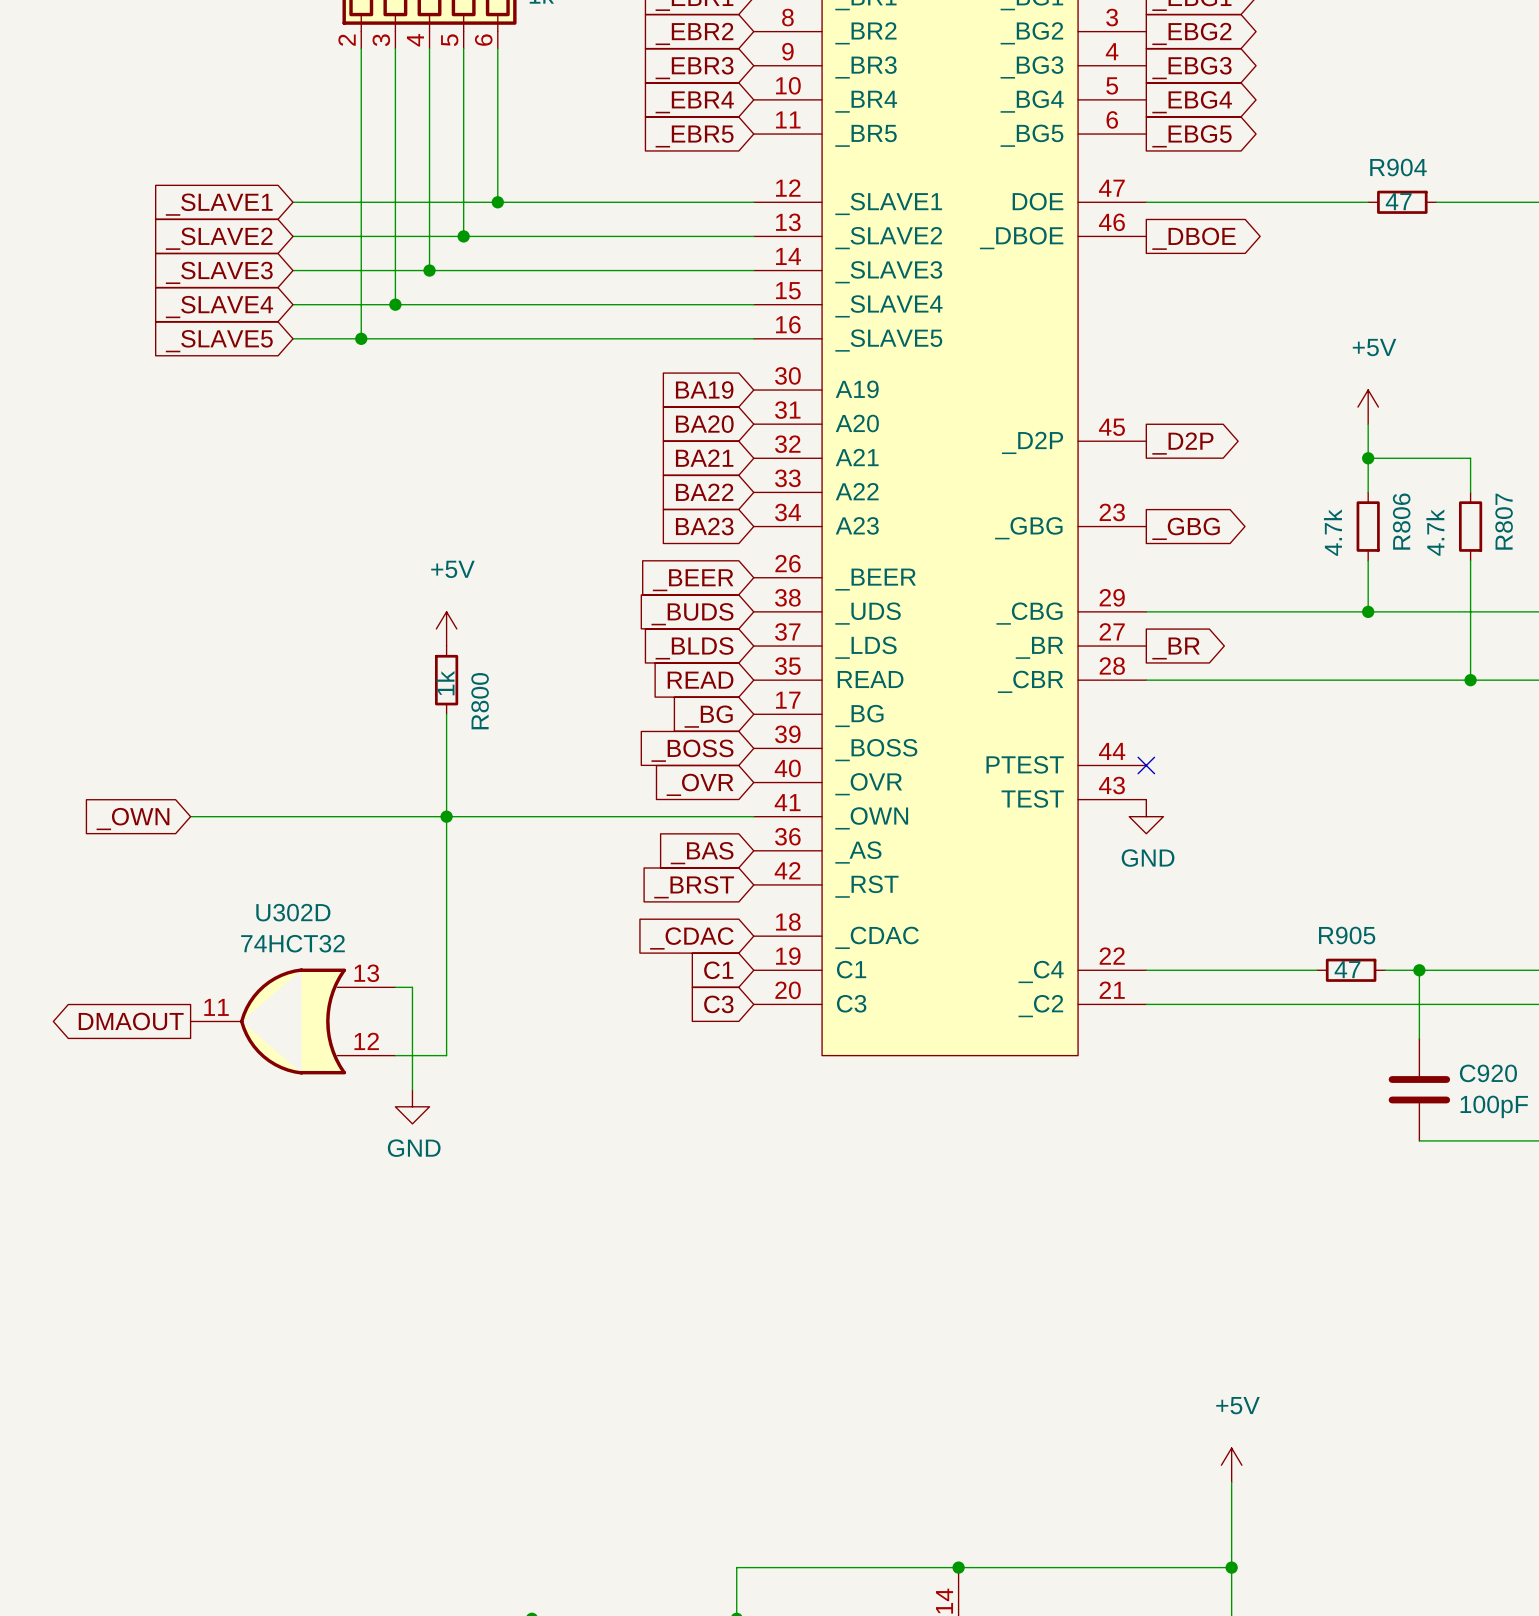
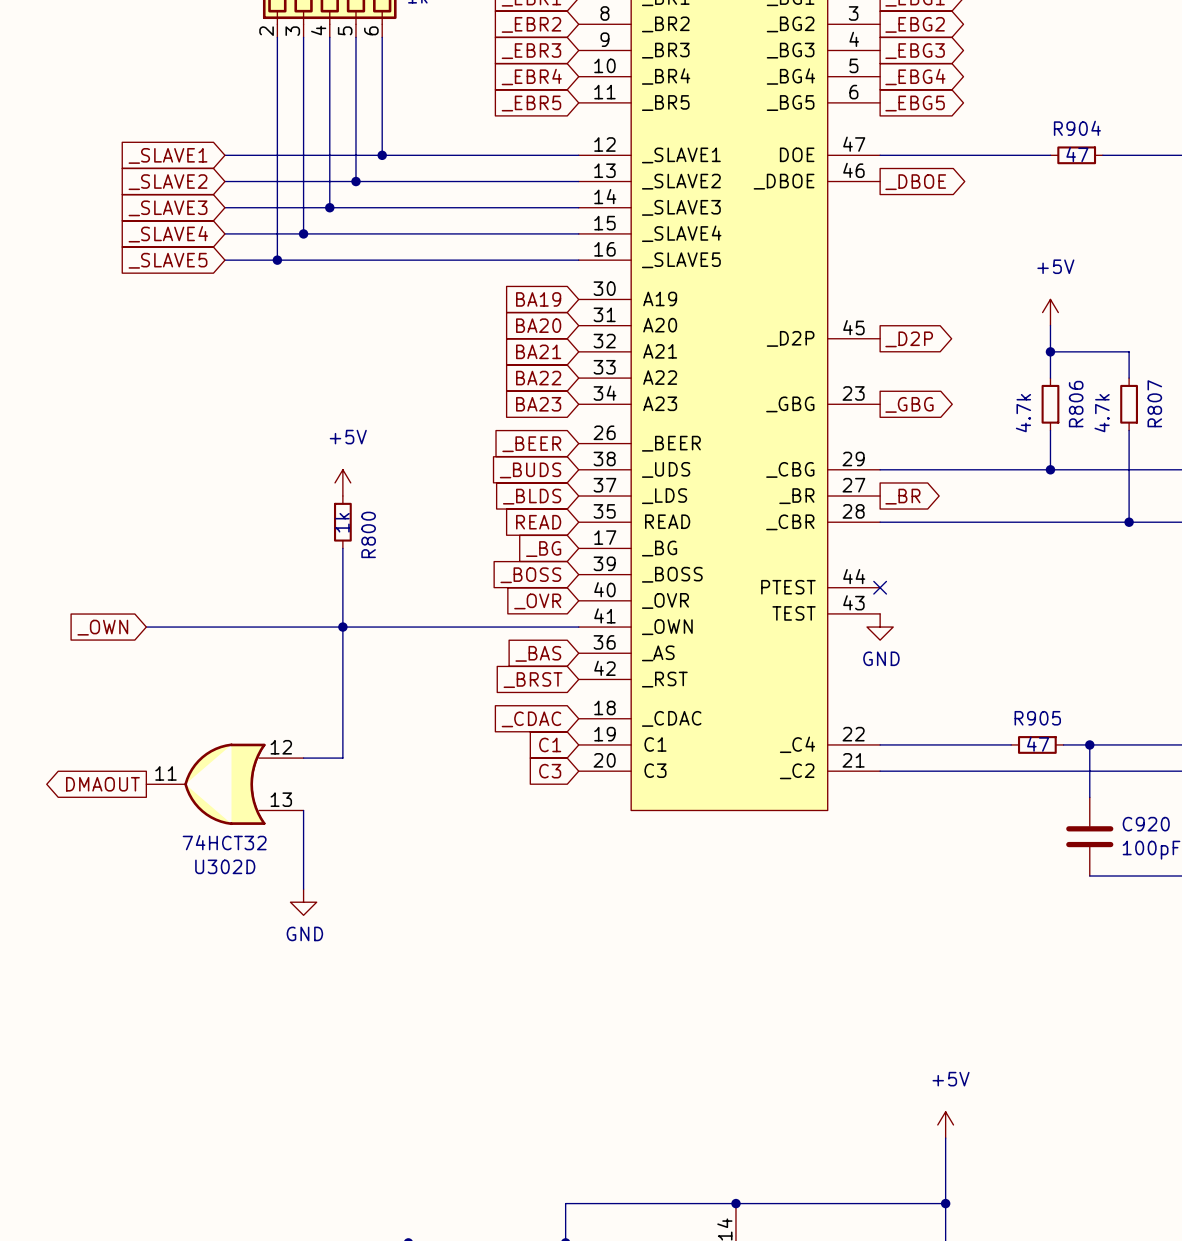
wire: (412, 987) (412, 1089) -> (303, 810) (303, 889)
wire: (446, 987) (446, 1055) (395, 1055) -> (342, 758) (316, 758)
U302D flip: as is (292, 1021) -> up-down (224, 784)
power symbol position: GND (412, 1106) -> GND (303, 902)

